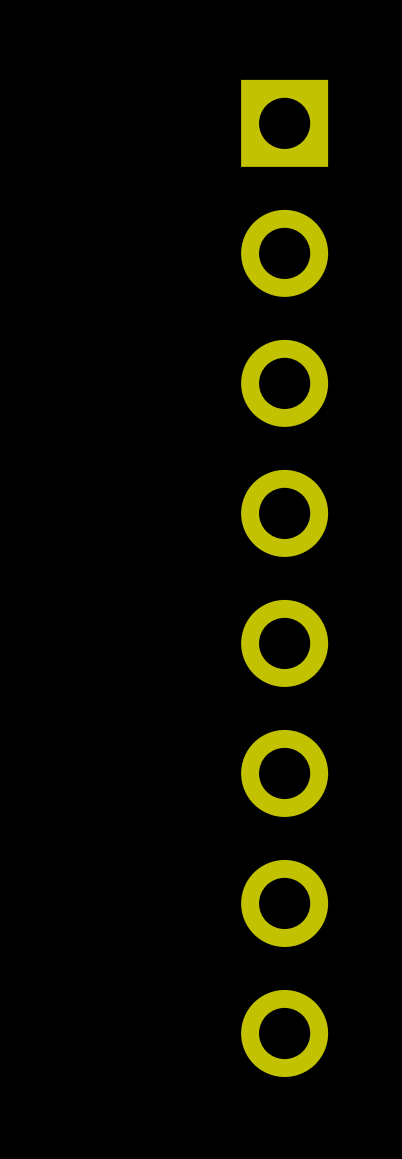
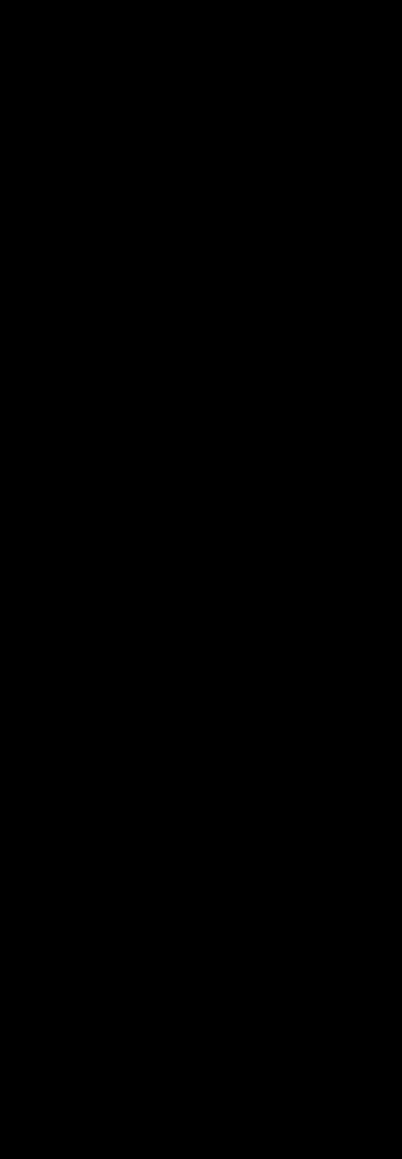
part: (284, 578) -> none

